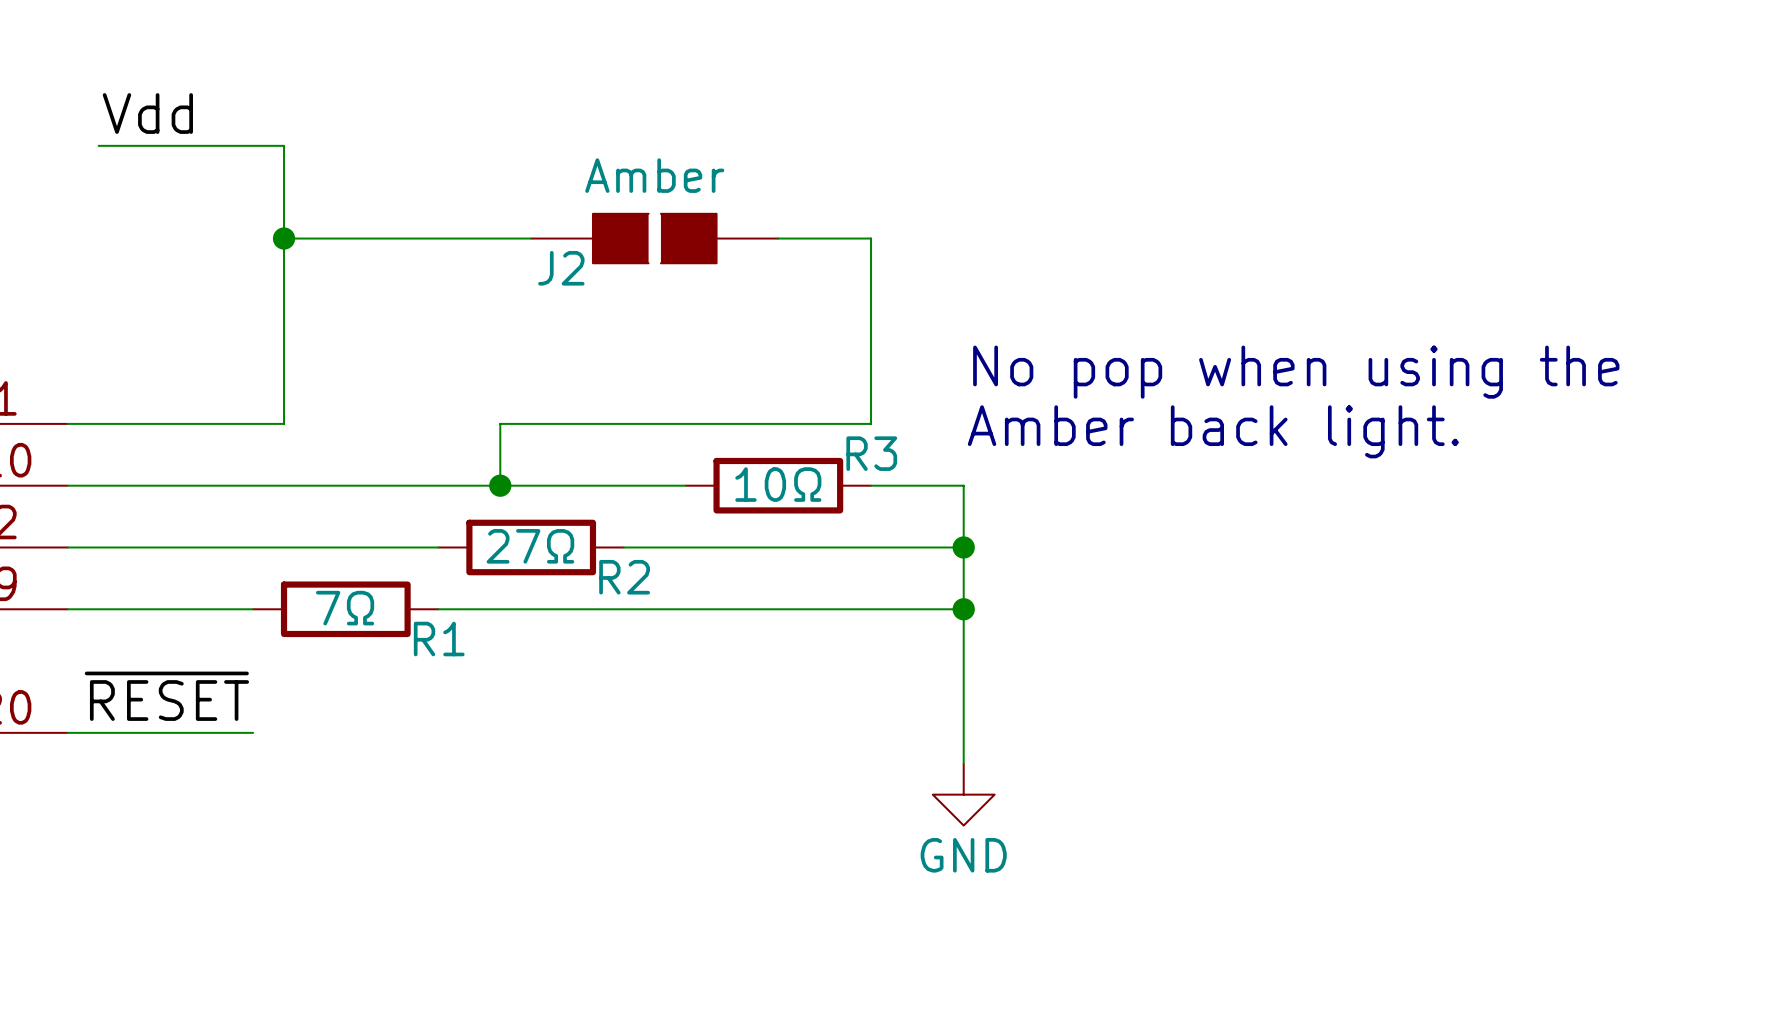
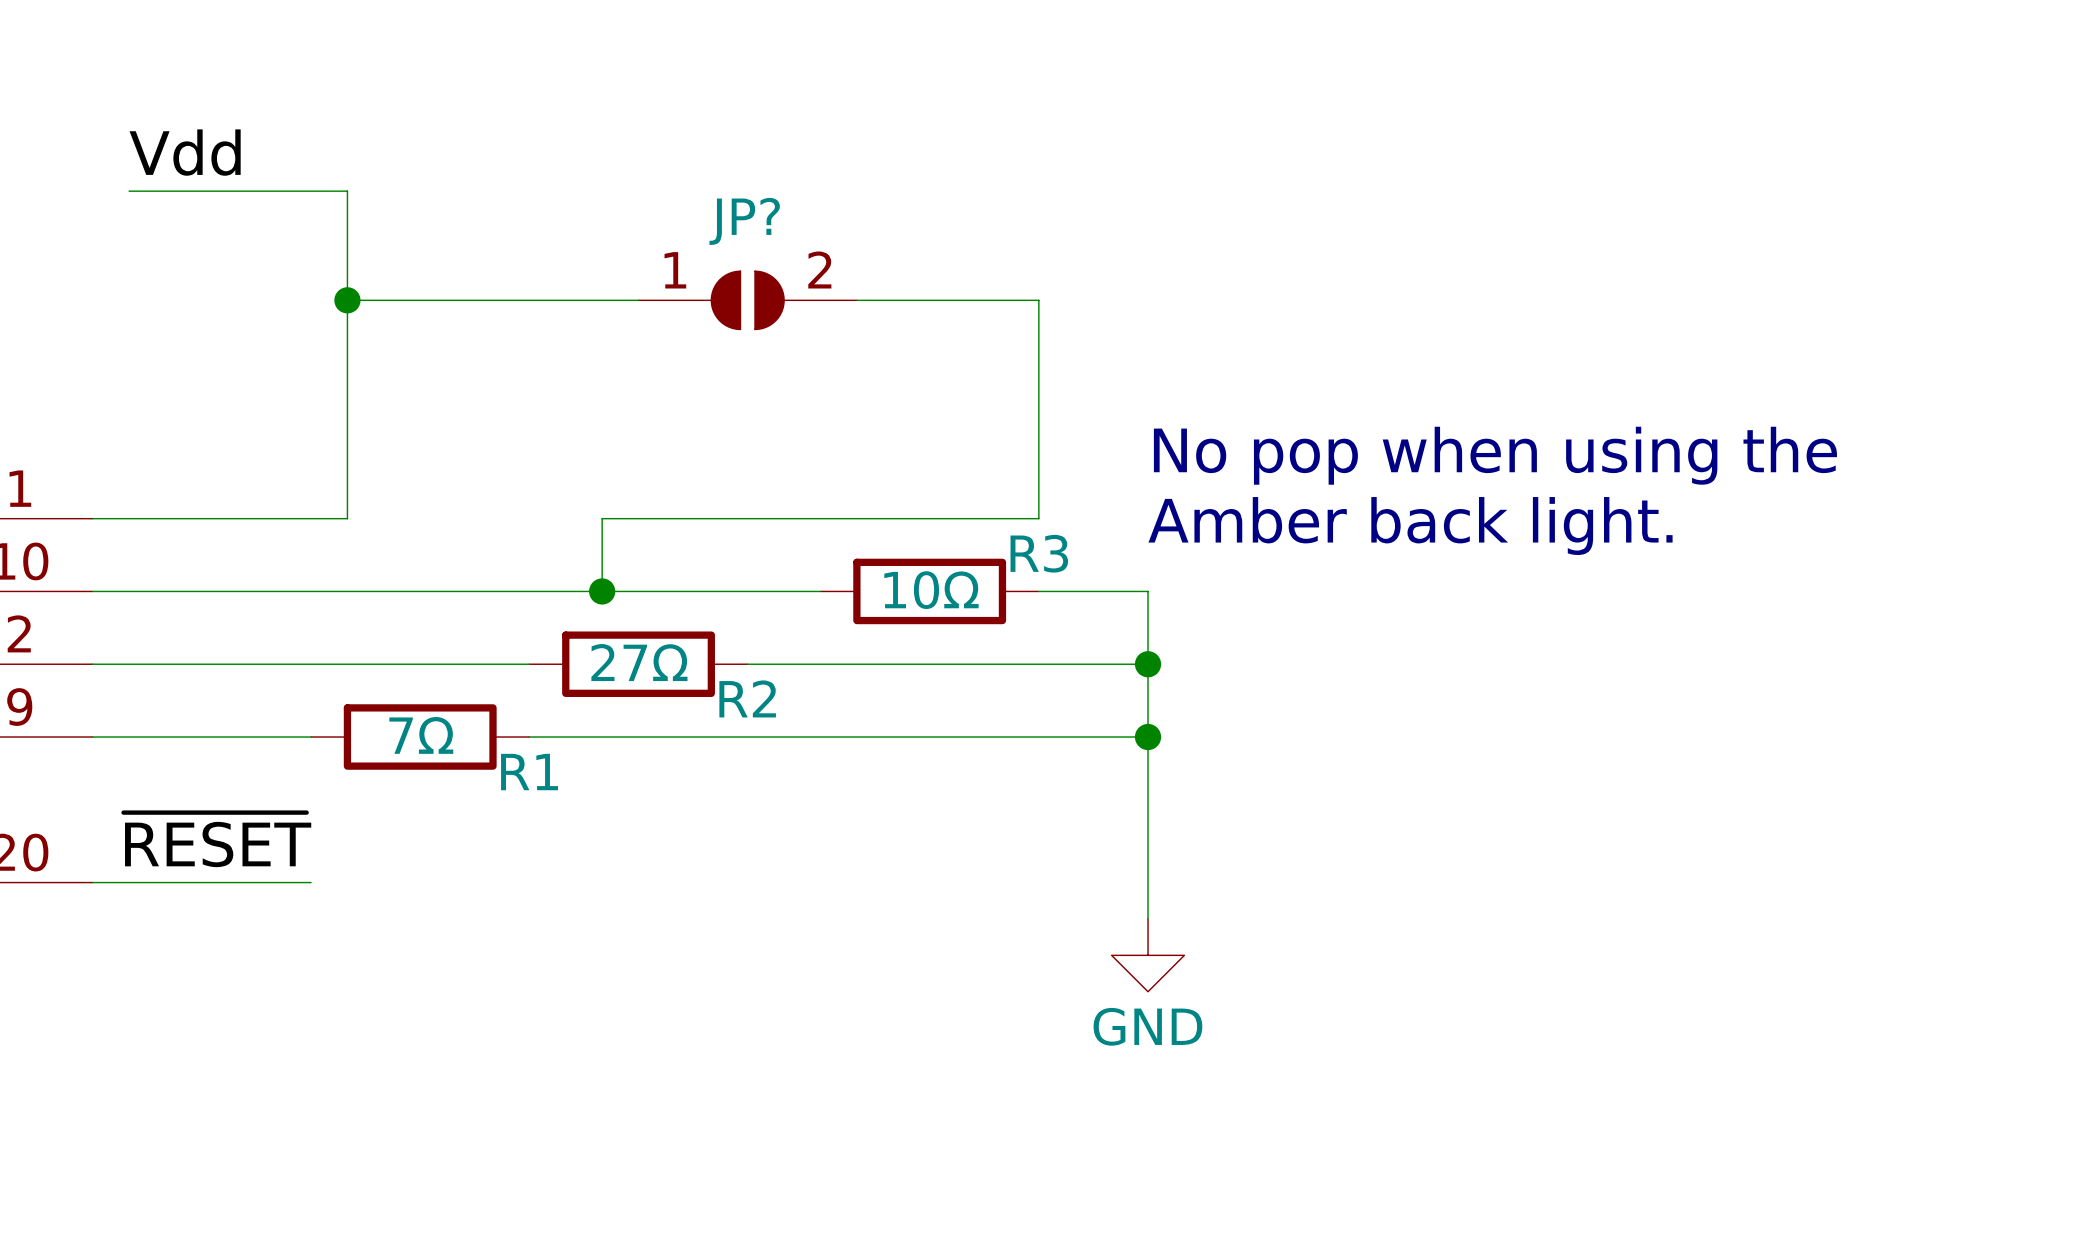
JP?: none -> (747, 300)
J2: Amber (654, 238) -> none

